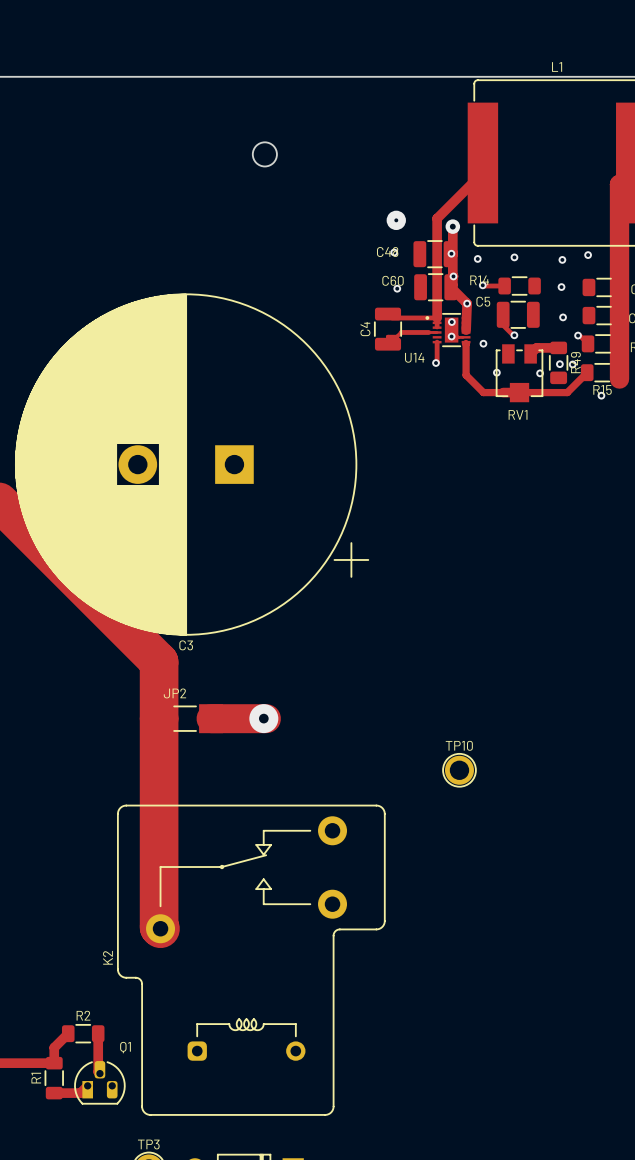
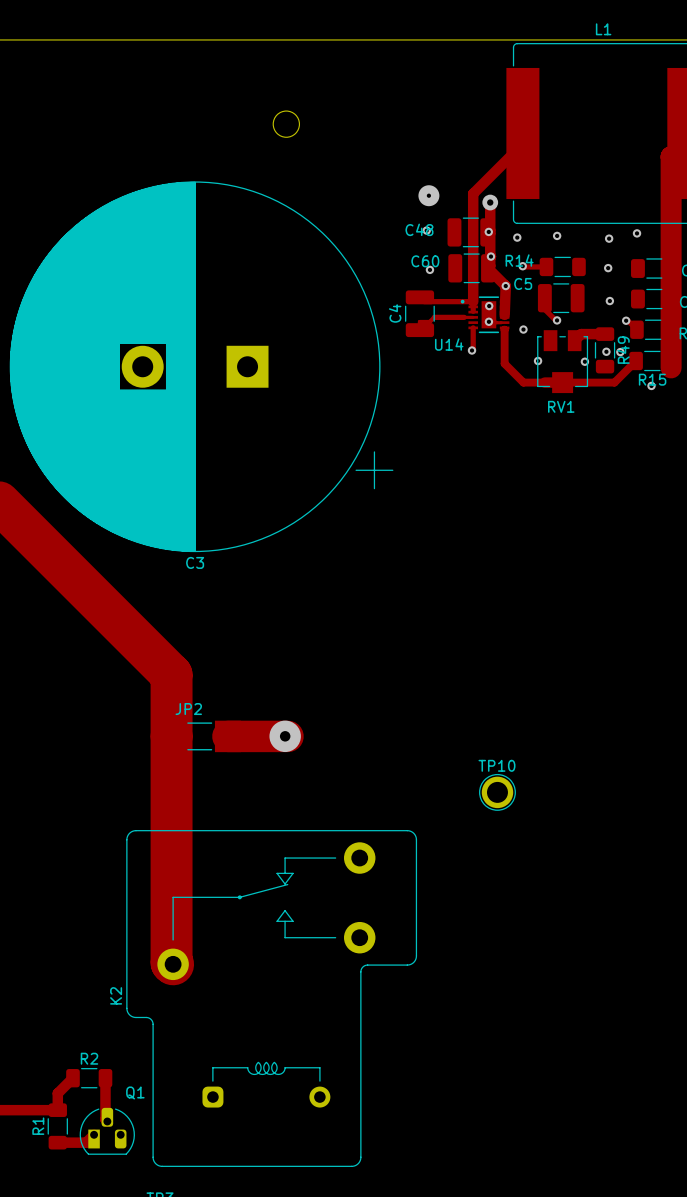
C3 position: (192, 464) -> (201, 366)

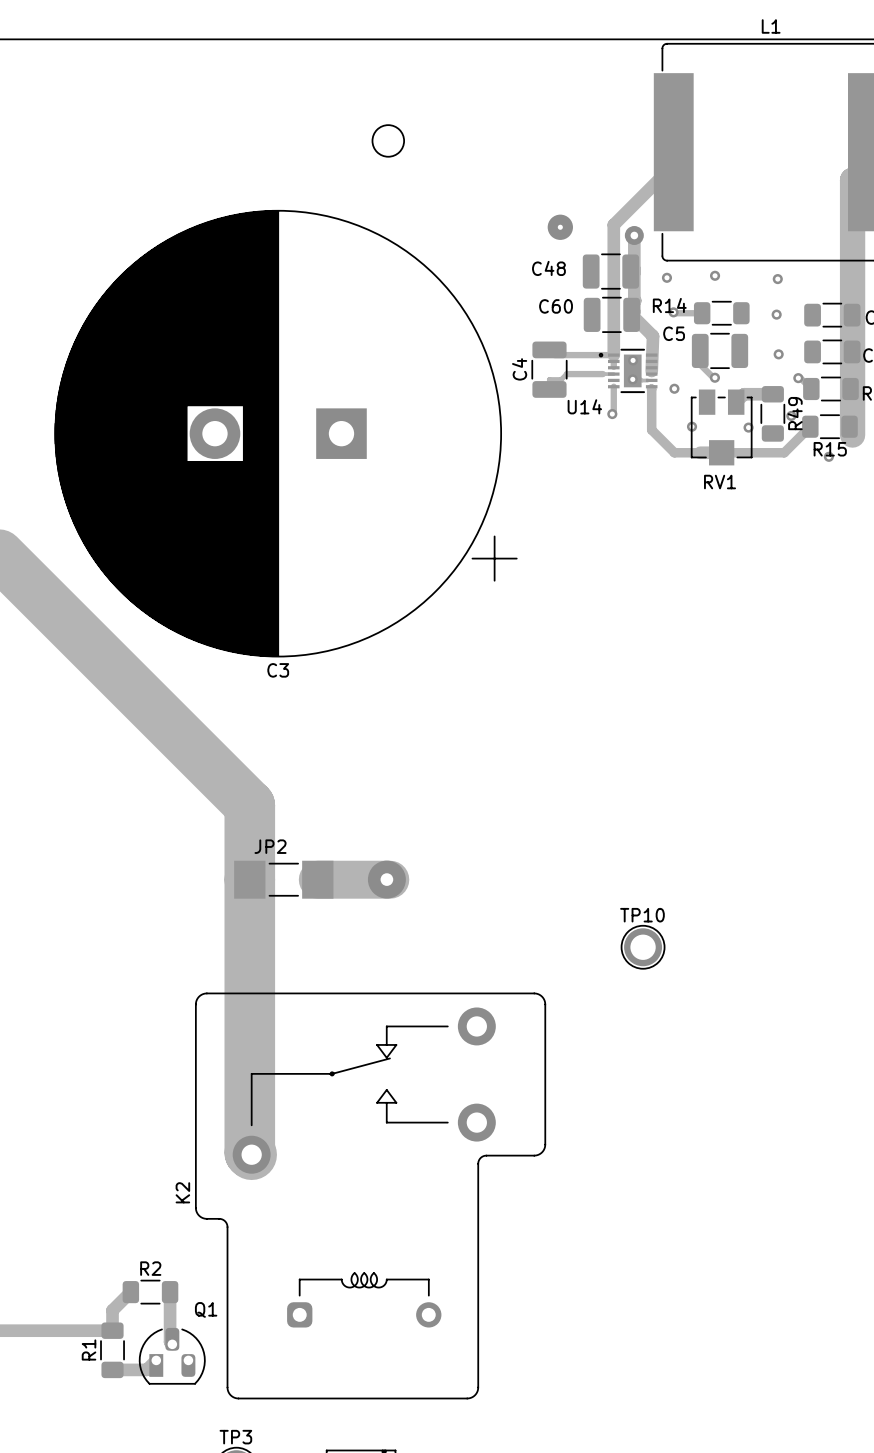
via: (426, 230) -> none
via: (488, 231) -> none
via: (637, 233) -> none
via: (490, 256) -> none
via: (429, 269) -> none
via: (505, 286) -> none
via: (606, 351) -> none

